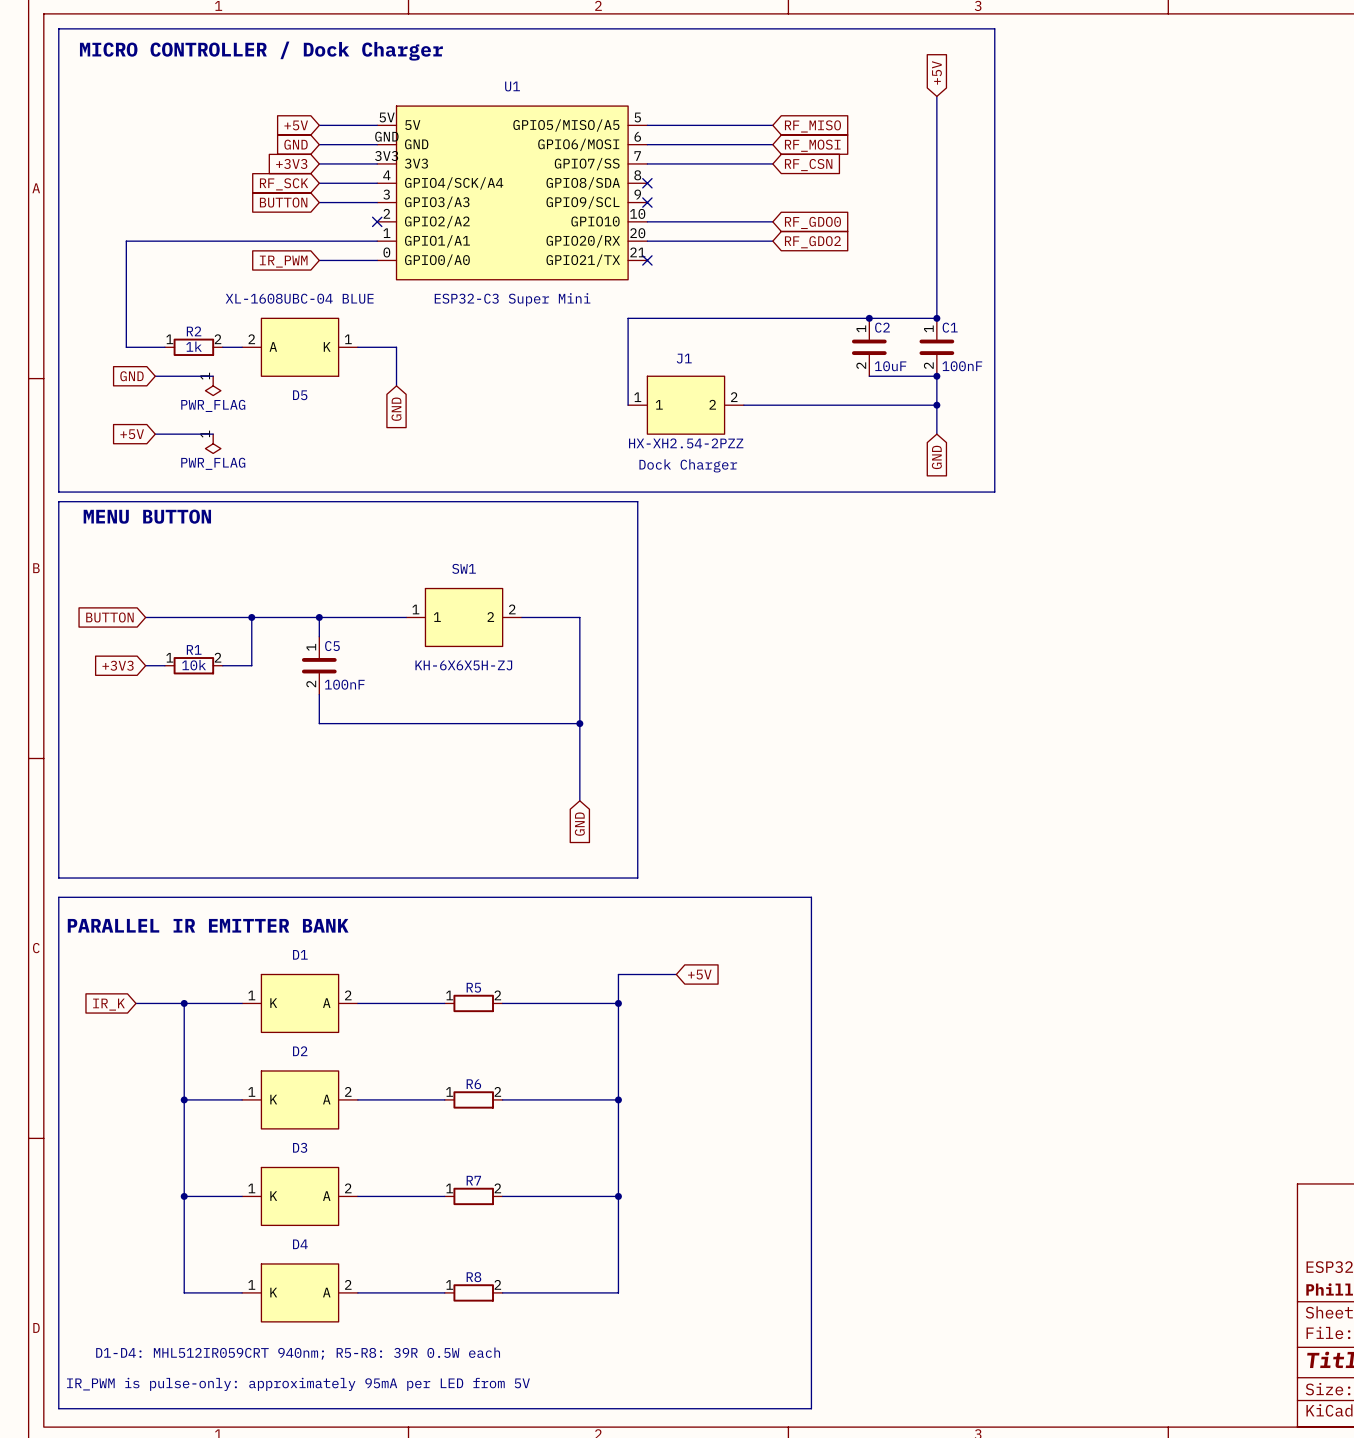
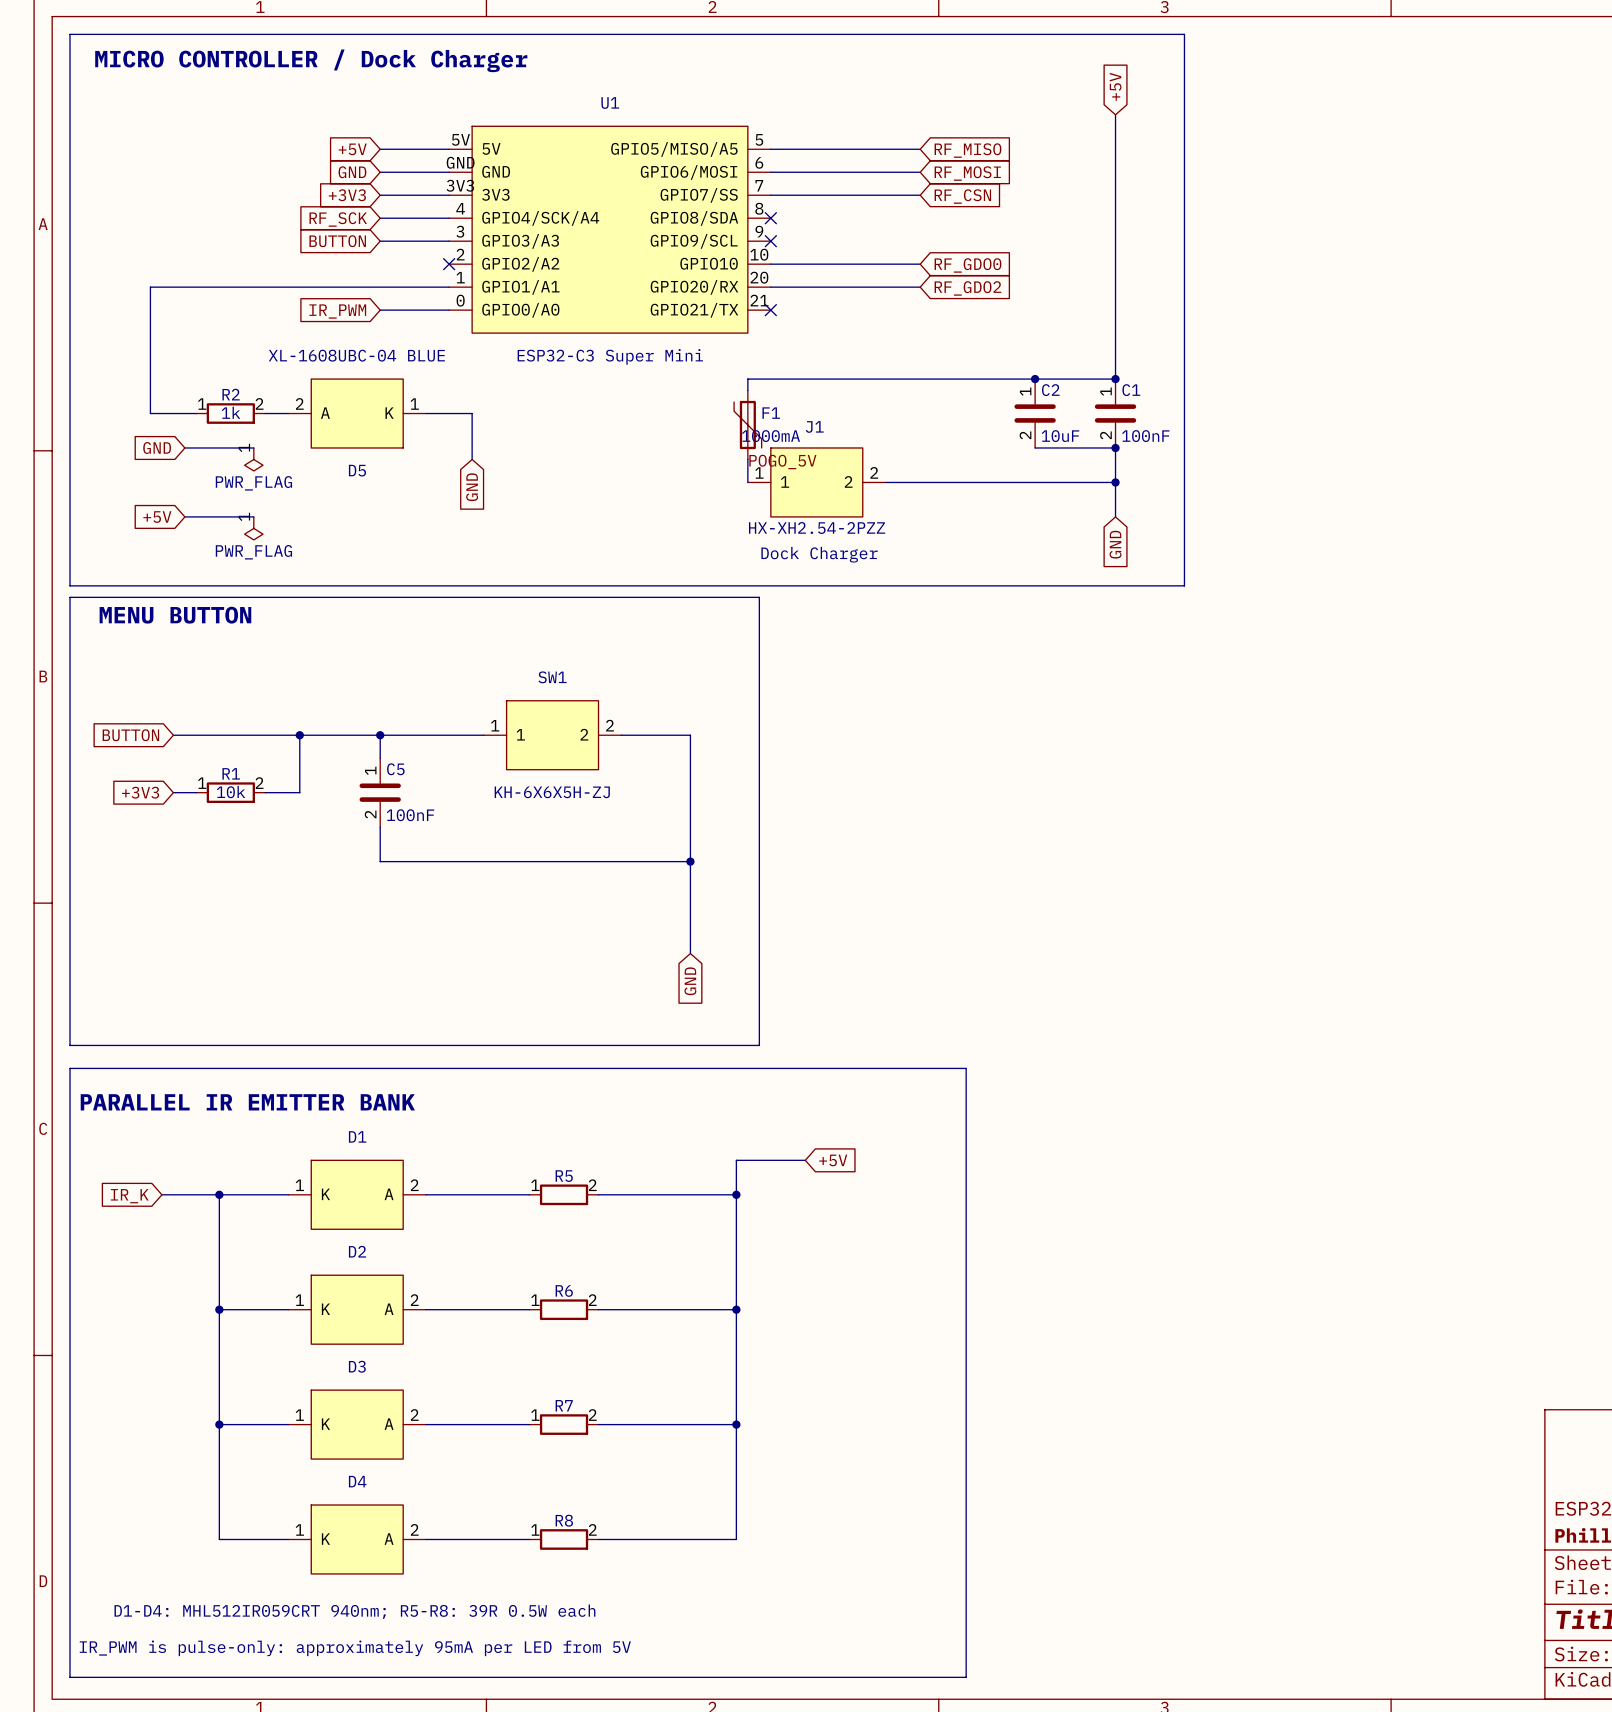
F1: none -> 1000mA (747, 425)
label: none -> POGO_5V (782, 462)

